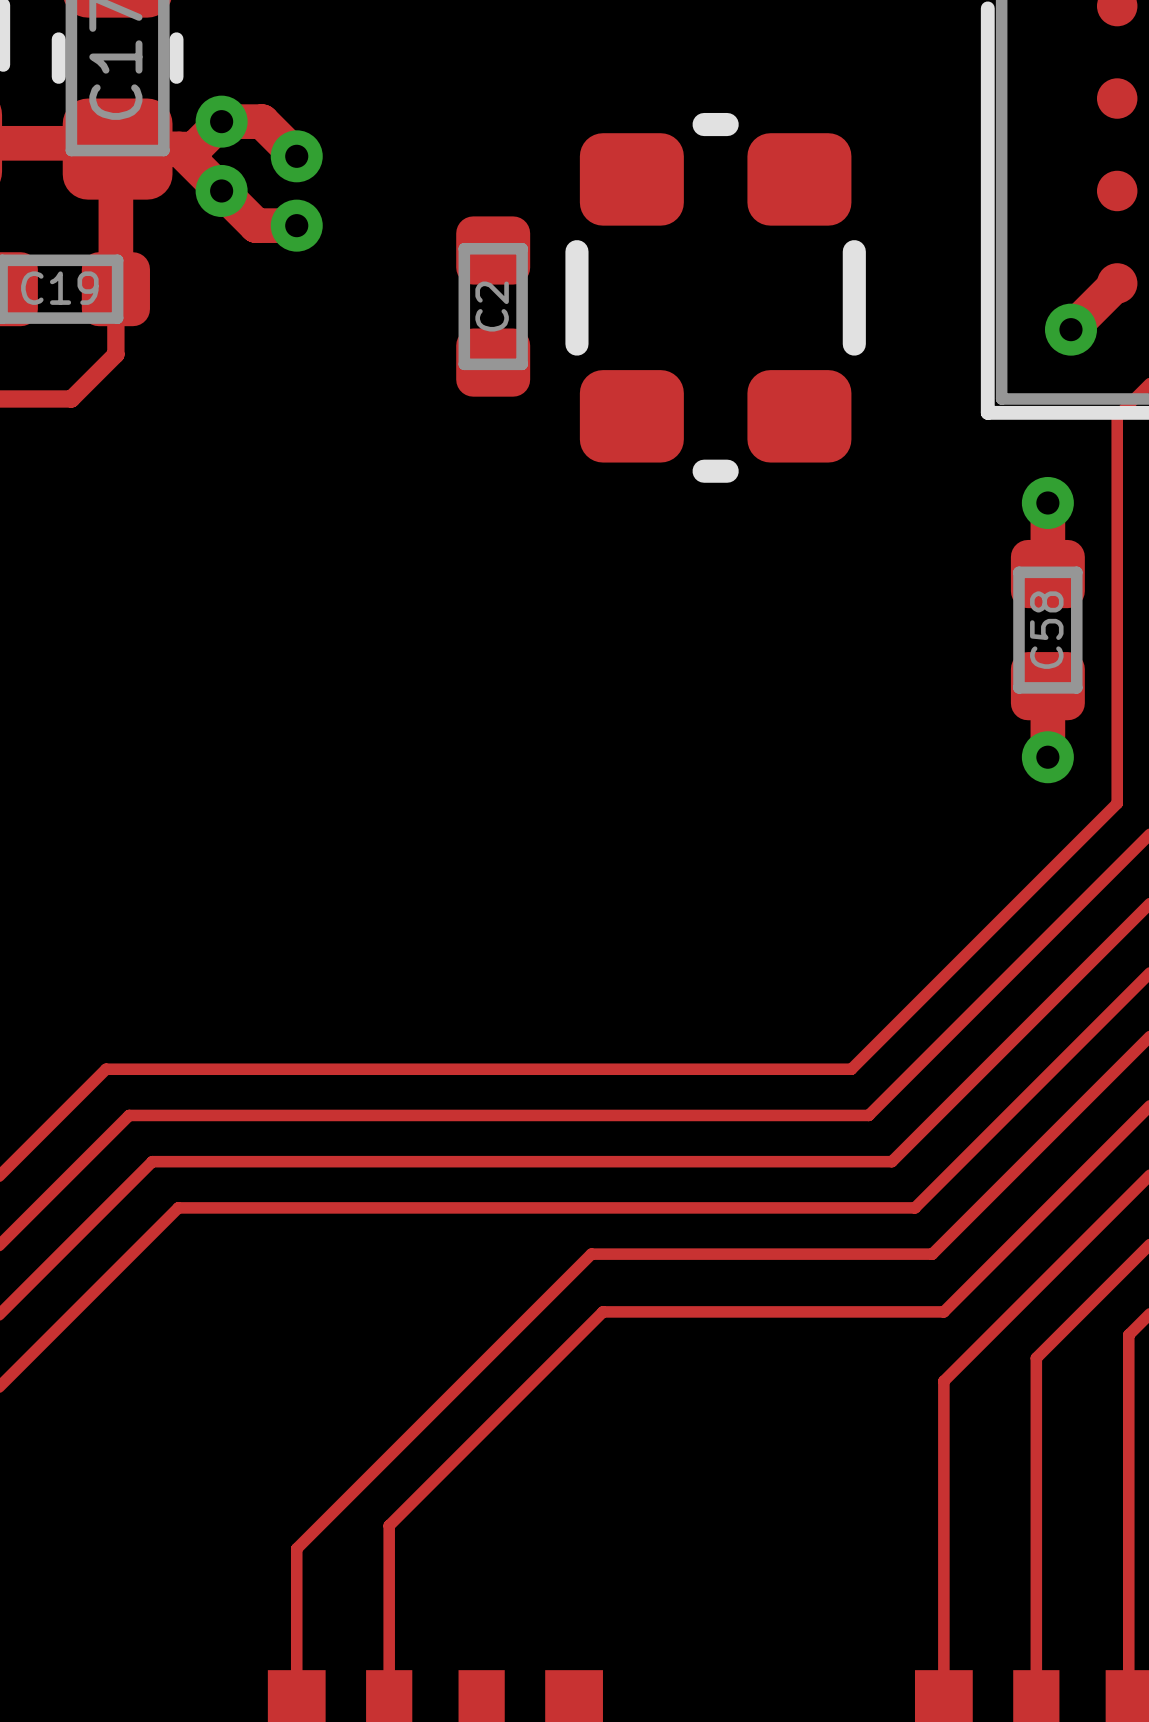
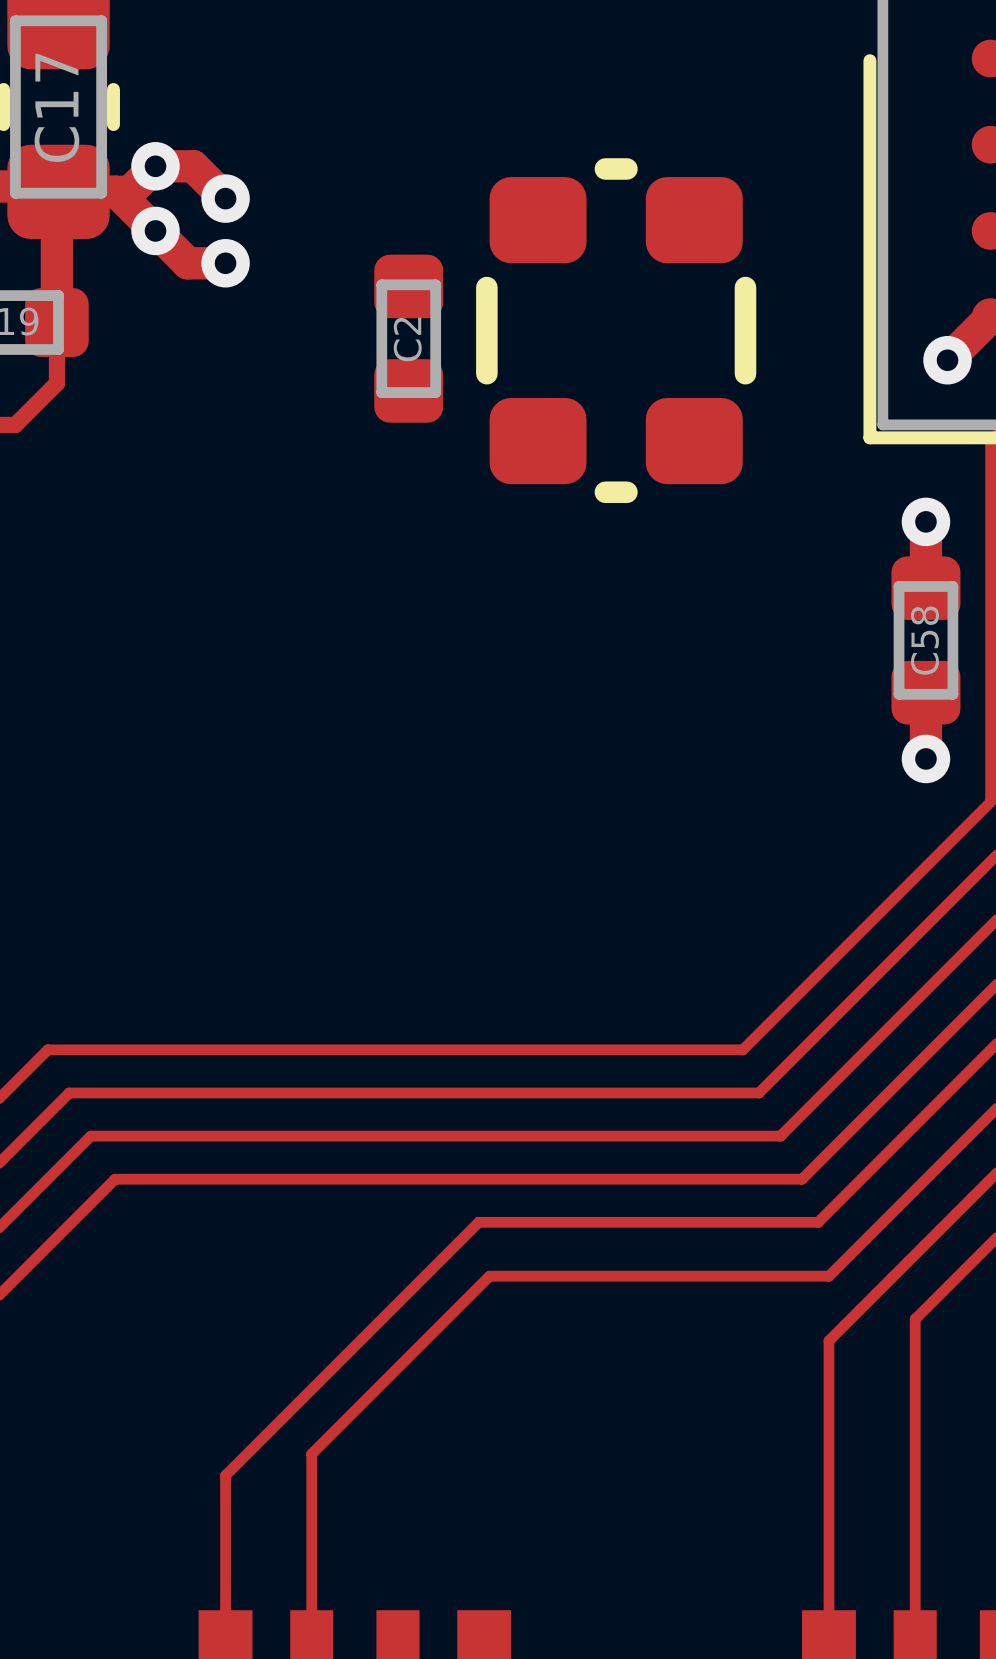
track: (591, 1254) (296, 1548) -> (500, 1222) (478, 1222) (225, 1475) (225, 1497)
track: (602, 1311) (389, 1525) -> (511, 1276) (489, 1276) (311, 1453) (311, 1475)

